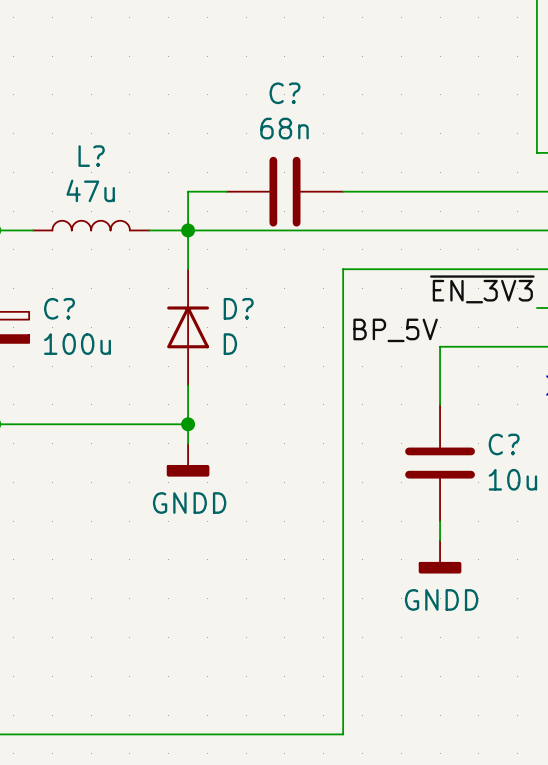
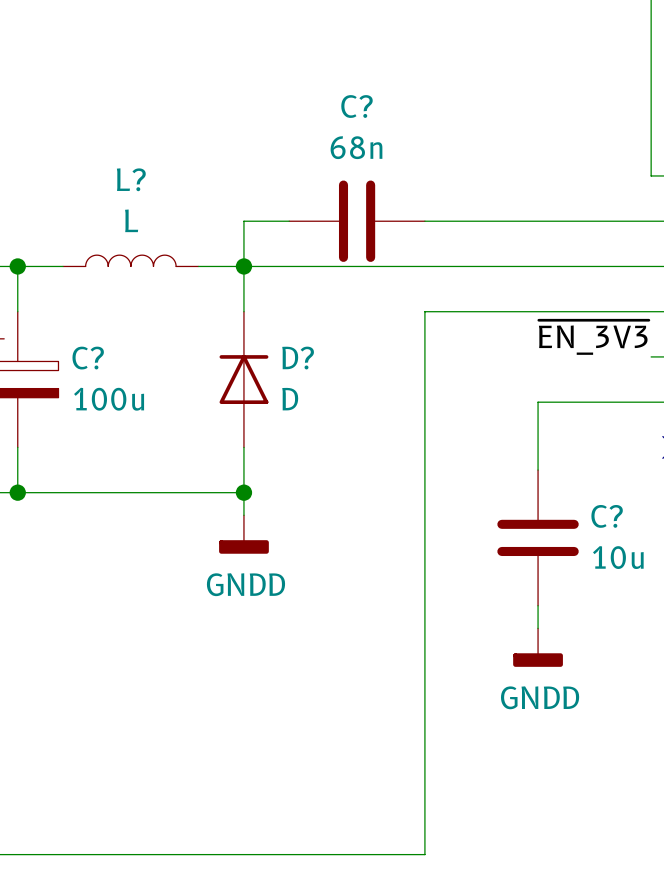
L? value: 47u (90, 190) -> L (131, 220)
label: BP_5V (395, 330) -> none

